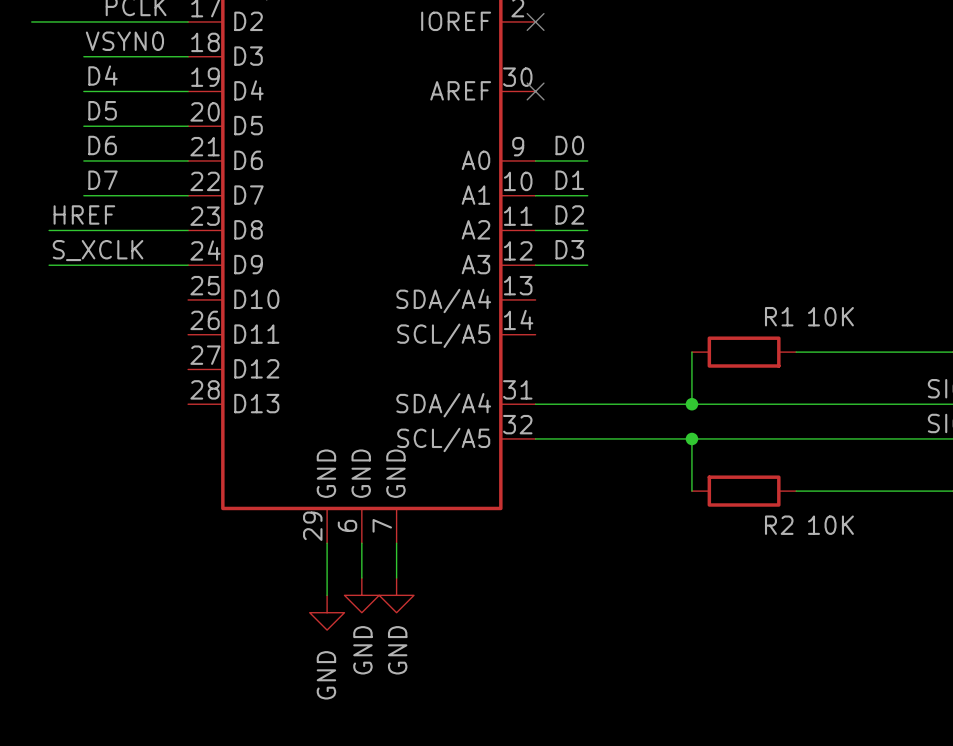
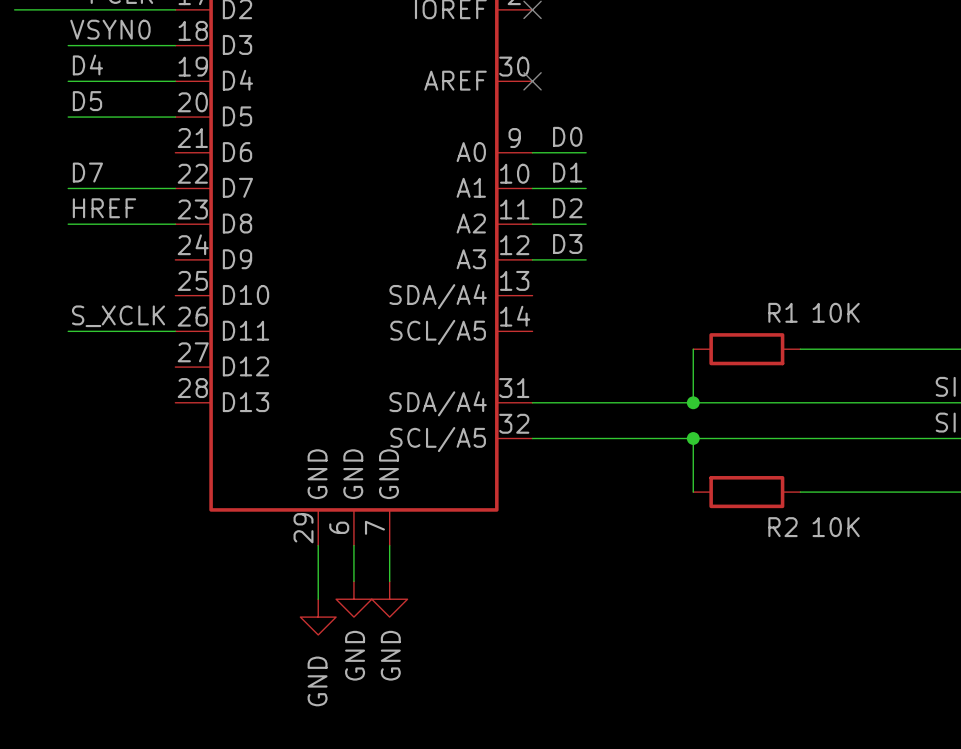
label: D6 (102, 145) -> none
wire: (83, 160) (188, 160) -> (68, 331) (175, 331)
label position: HREF (84, 214) -> HREF (104, 208)
wire: (49, 230) (83, 230) -> none
label position: S_XCLK (98, 250) -> S_XCLK (118, 316)
wire: (49, 265) (188, 265) -> none

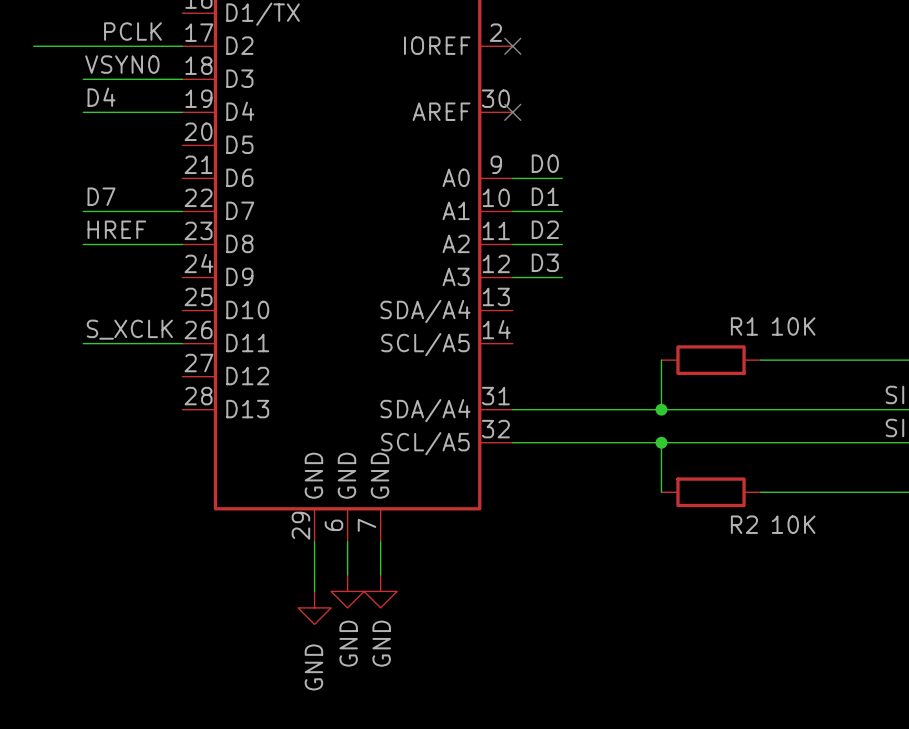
label: D5 (87, 101) -> none
wire: (68, 117) (175, 117) -> none

